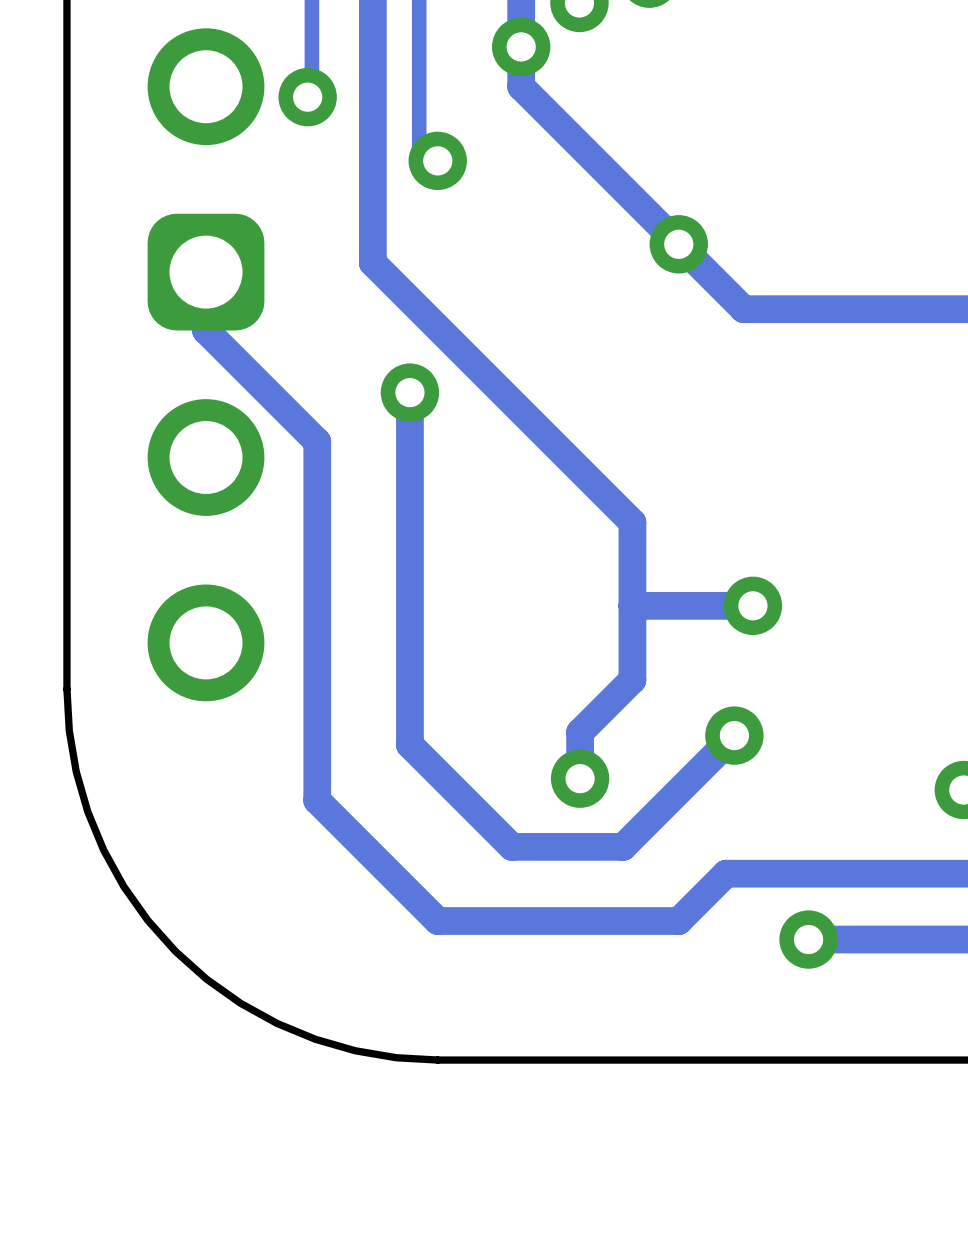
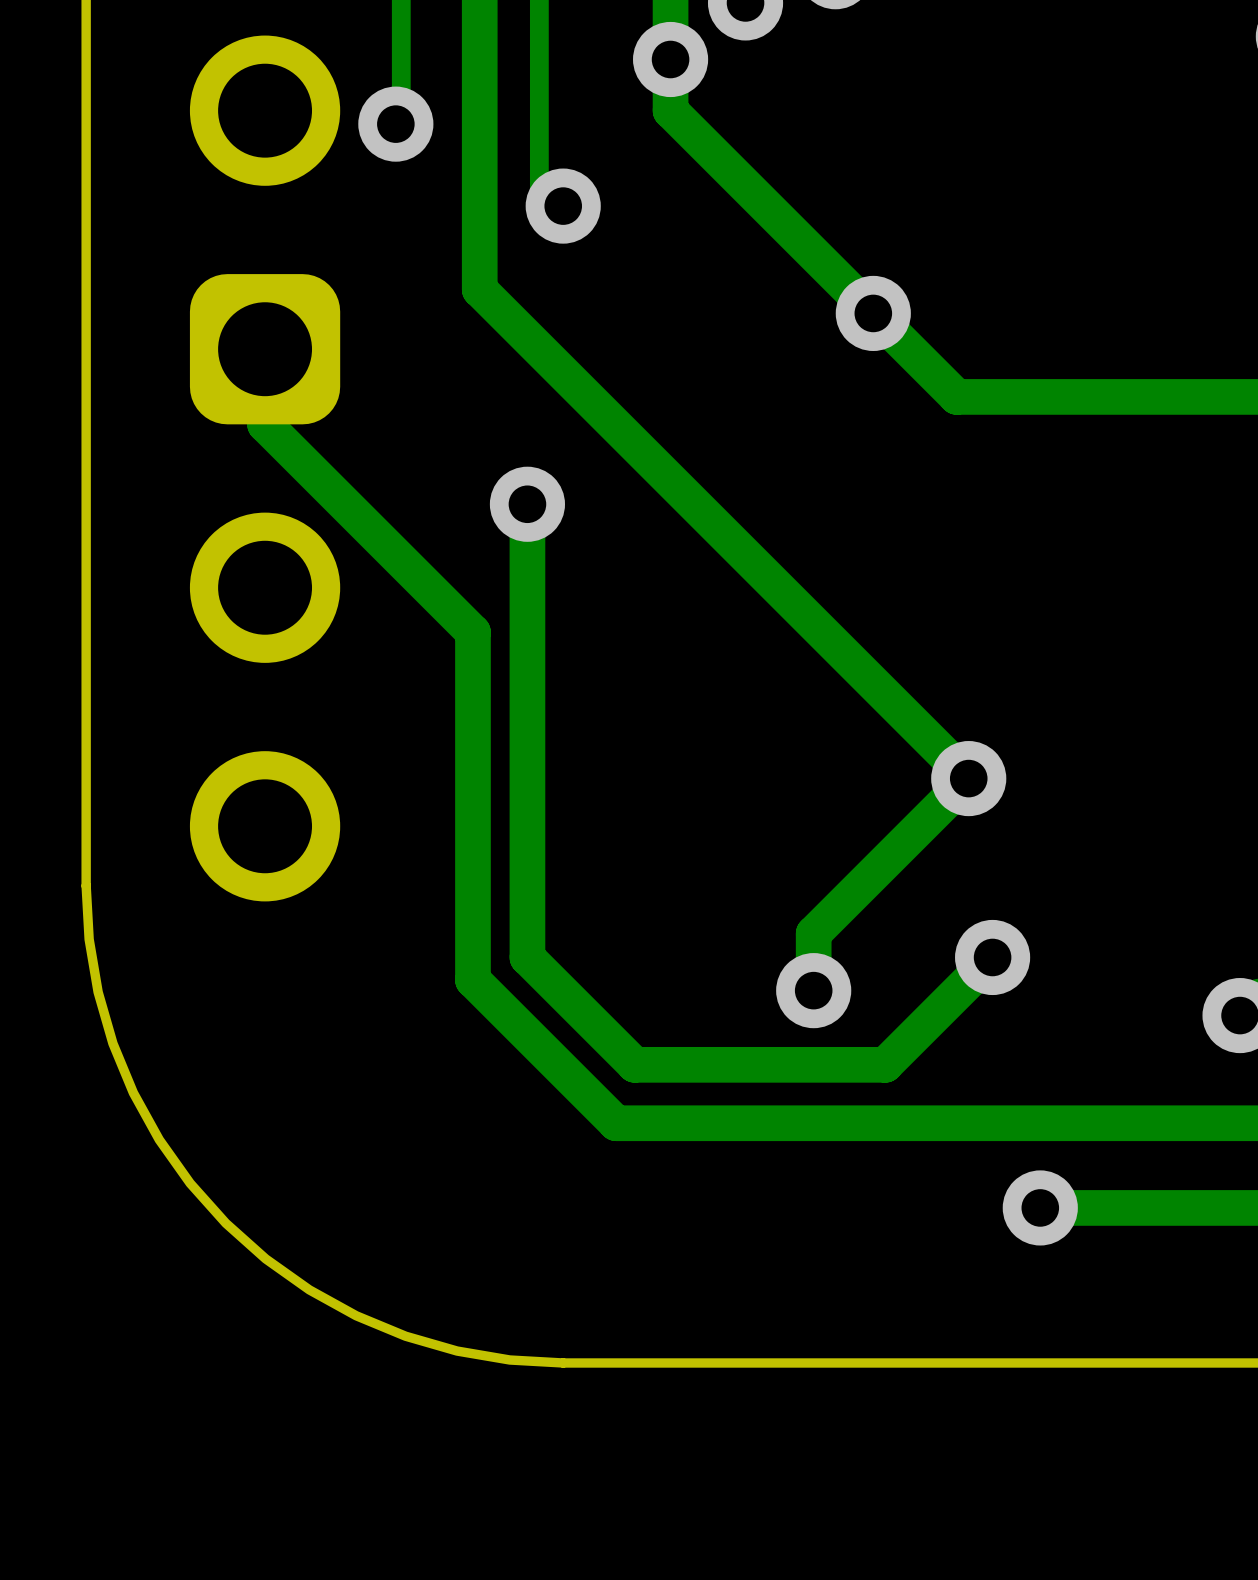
track: (372, 225) (372, 262) (632, 522) (632, 679) (580, 732) (580, 778) -> (479, 289) (968, 778) (813, 933) (813, 990)
track: (317, 441) (317, 800) (437, 921) (678, 921) (726, 873) -> (408, 567) (472, 632) (472, 980) (616, 1123) (934, 1123)
track: (752, 605) (632, 605) -> none
track: (734, 735) (623, 846) (511, 846) (493, 828) -> (992, 957) (885, 1064) (634, 1064)
via position: (734, 735) -> (992, 957)
via position: (580, 778) -> (813, 990)

